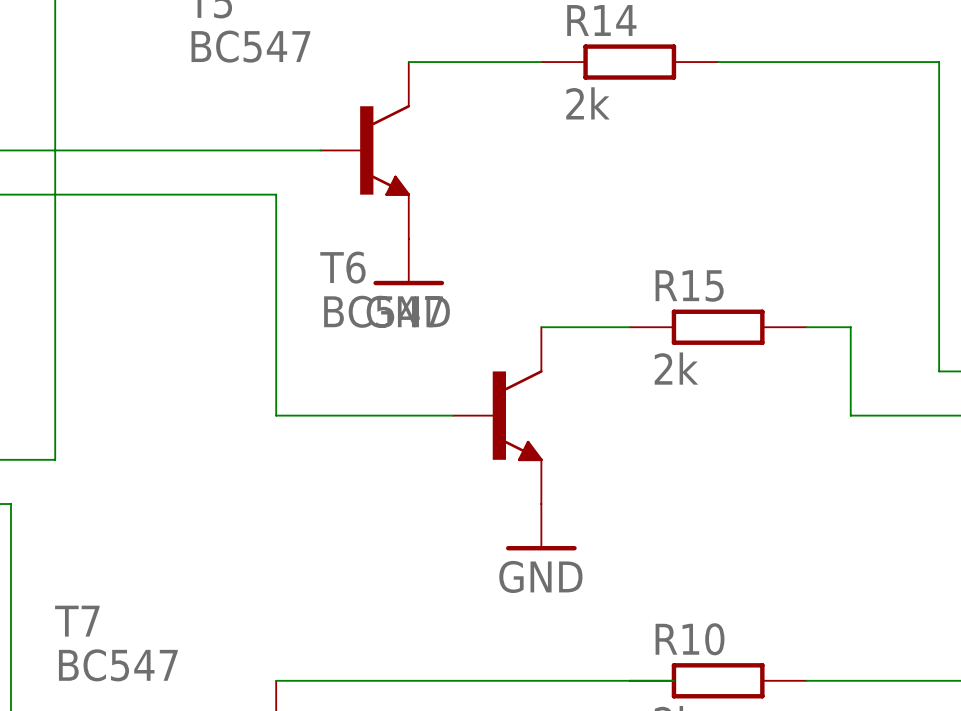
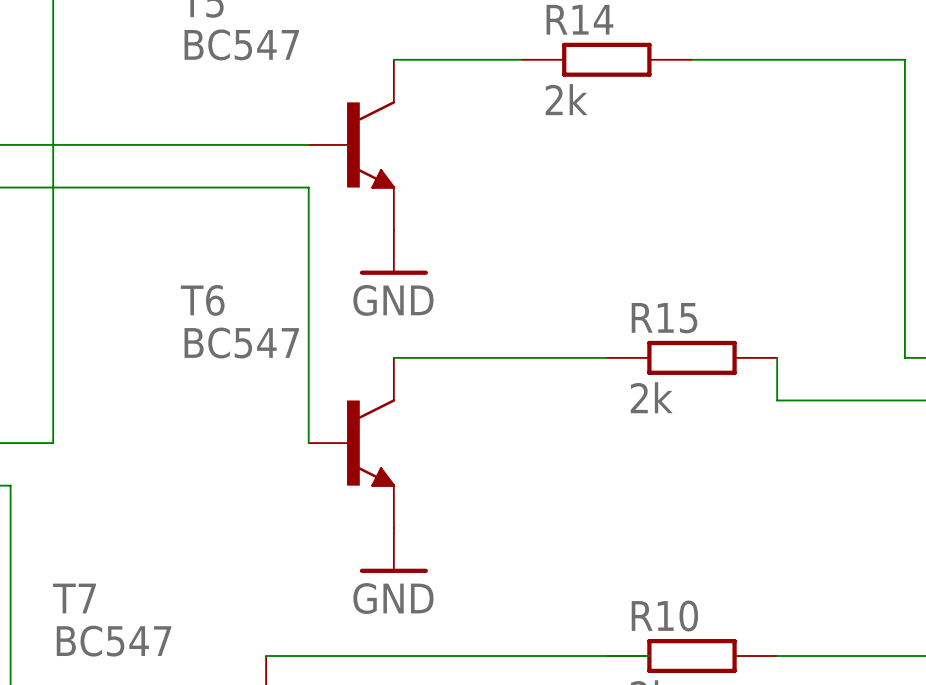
wire: (276, 194) (276, 415) (452, 415) -> (266, 187) (308, 187) (308, 443)
wire: (541, 327) (629, 327) -> none
R15 position: (718, 327) -> (691, 357)
wire: (806, 327) (850, 327) (850, 415) -> (777, 357) (777, 400) (819, 400)
wire: none -> (393, 357) (606, 357)
T6 position: (497, 415) -> (351, 443)
power symbol position: GND (541, 527) -> GND (393, 550)

